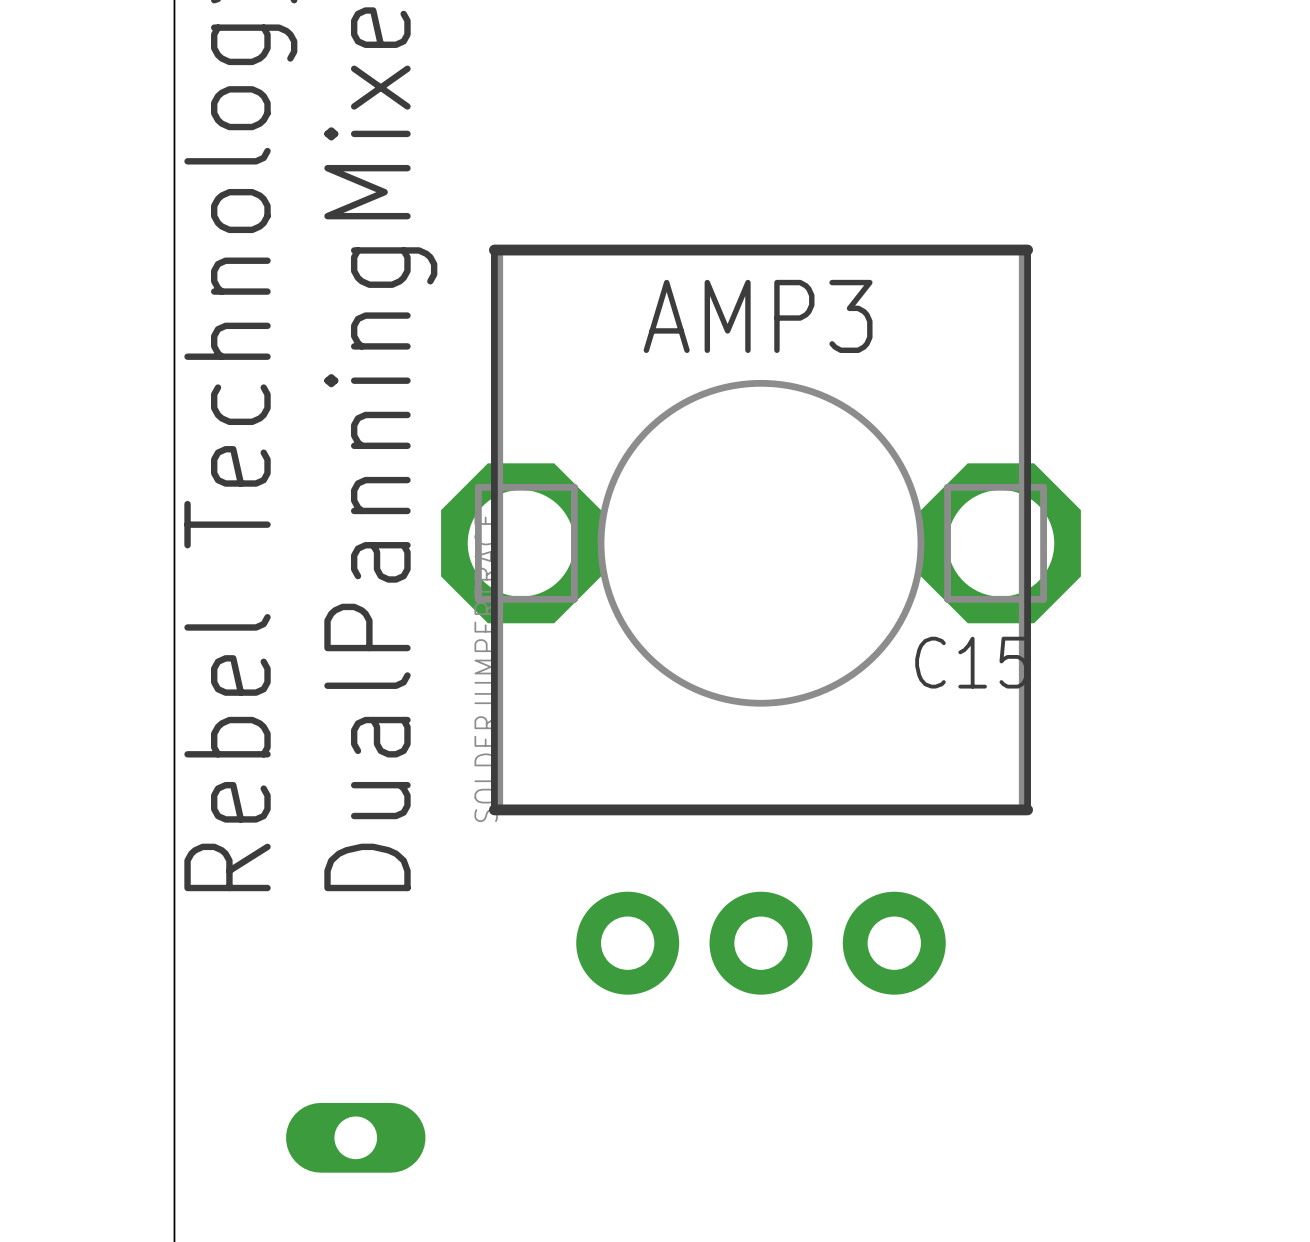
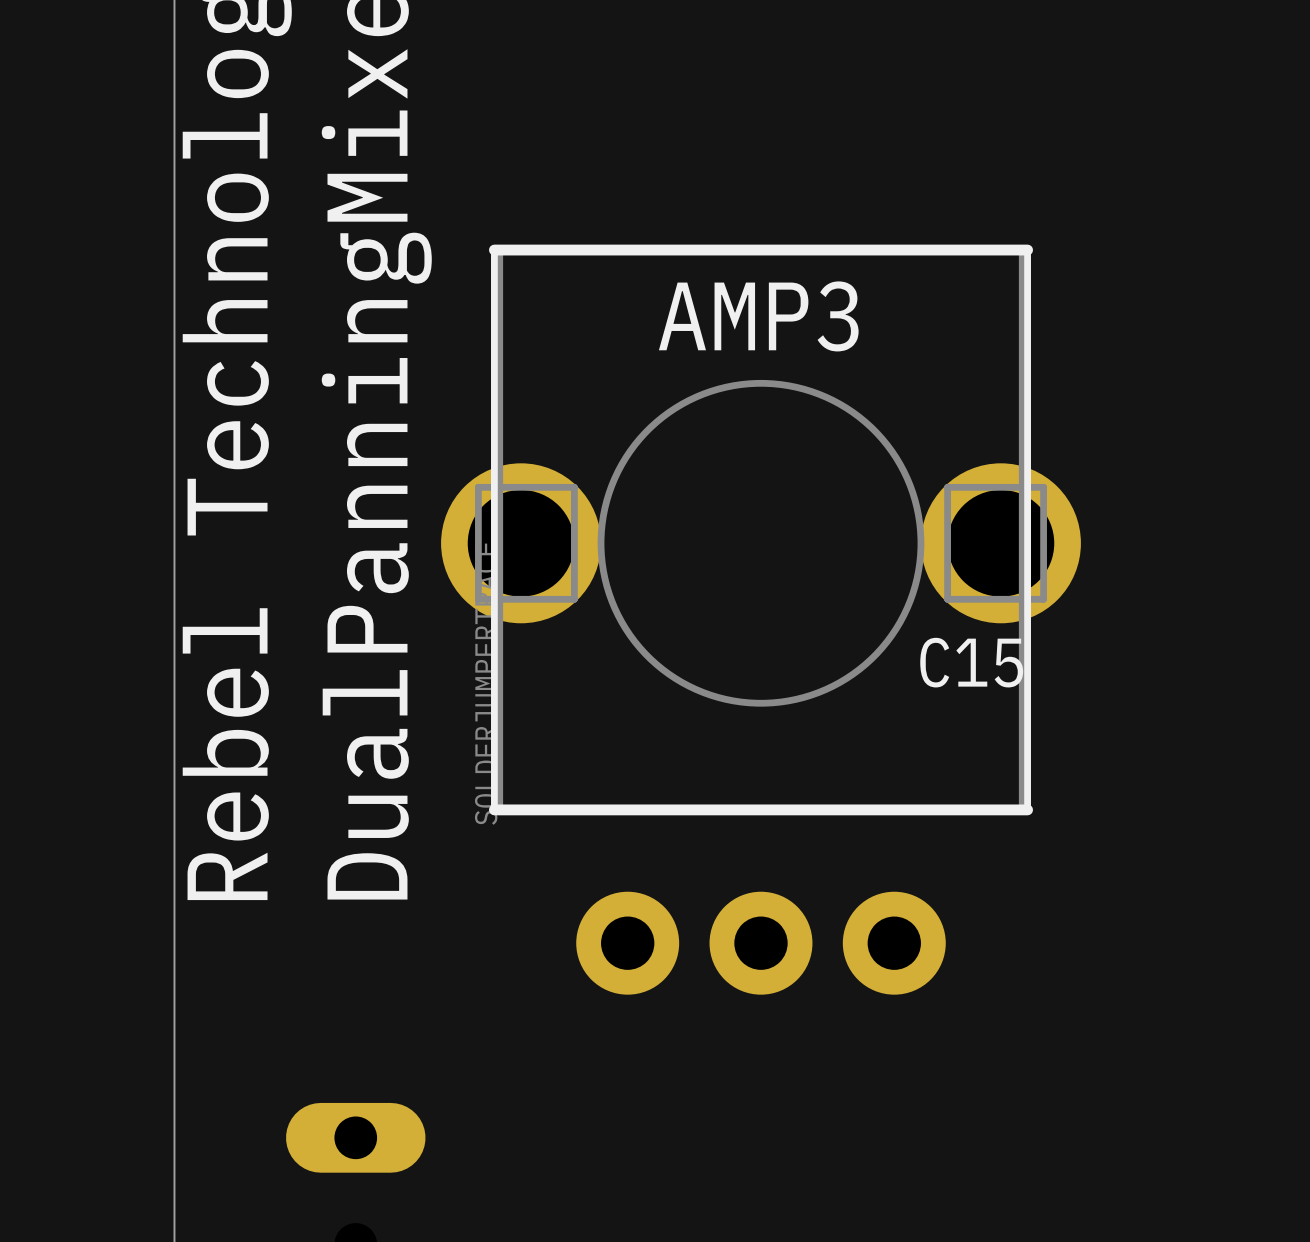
AMP3 footprint: [441, 244, 1081, 995] -> [441, 244, 1081, 995]

